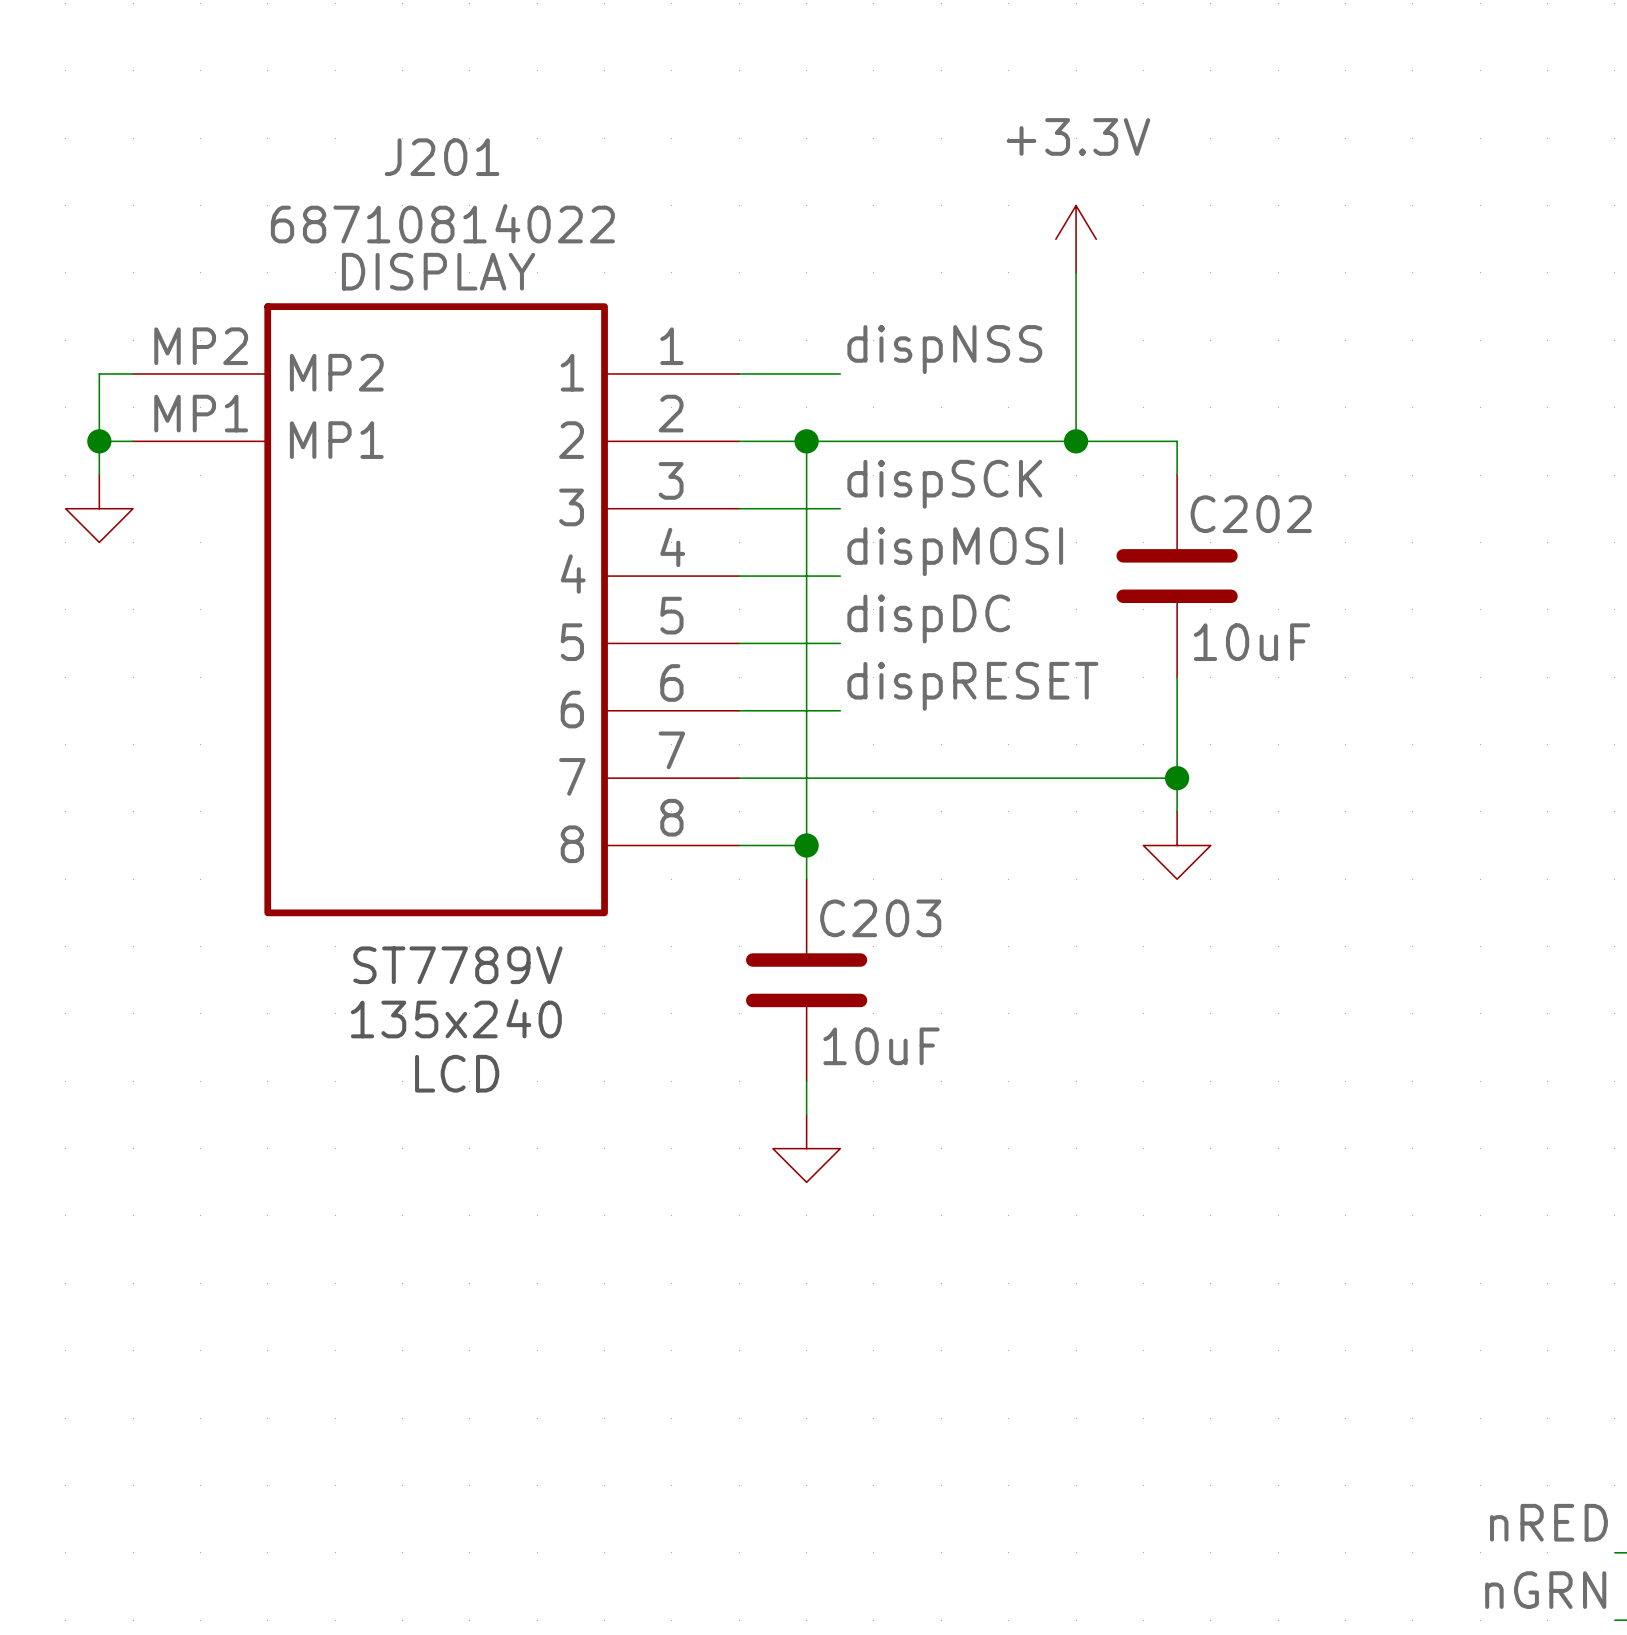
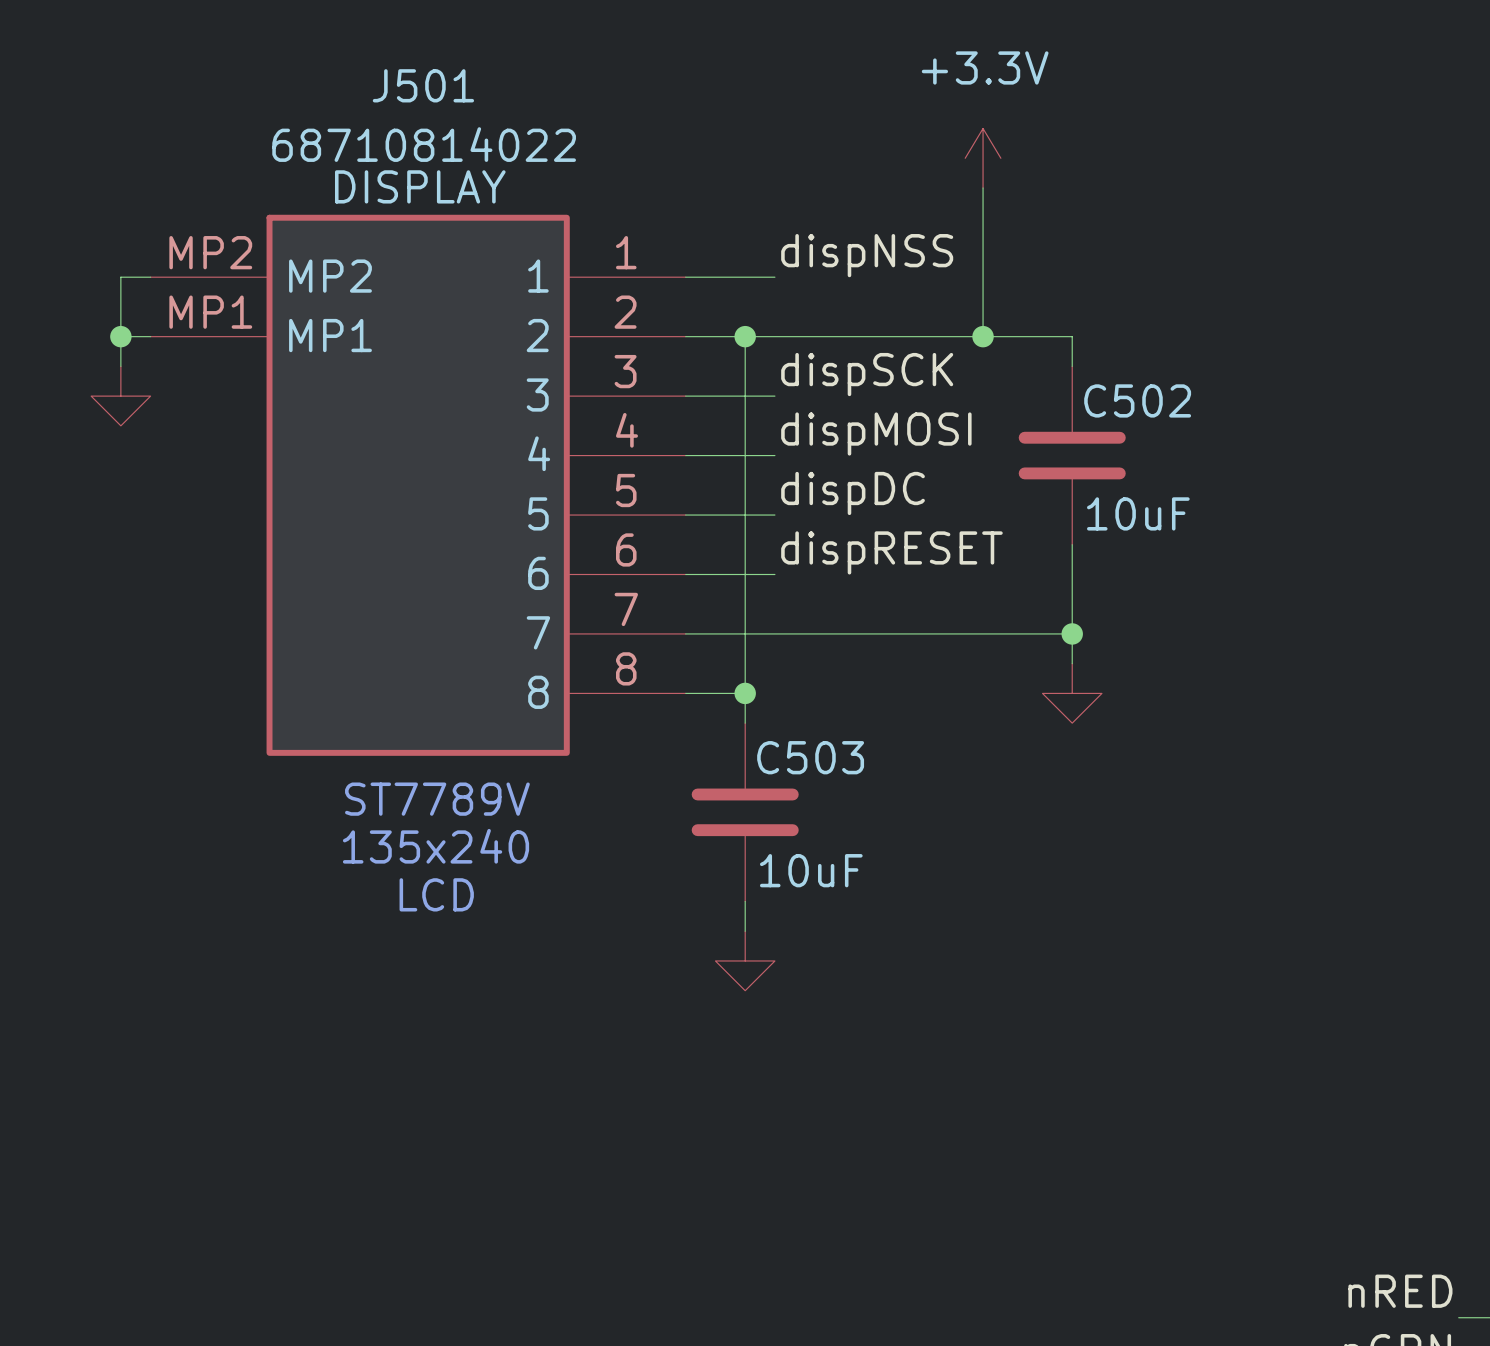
J201 name: J201 (442, 157) -> J501 (423, 85)
C202 name: C202 (1251, 514) -> C502 (1137, 400)
C203 name: C203 (880, 918) -> C503 (810, 757)

